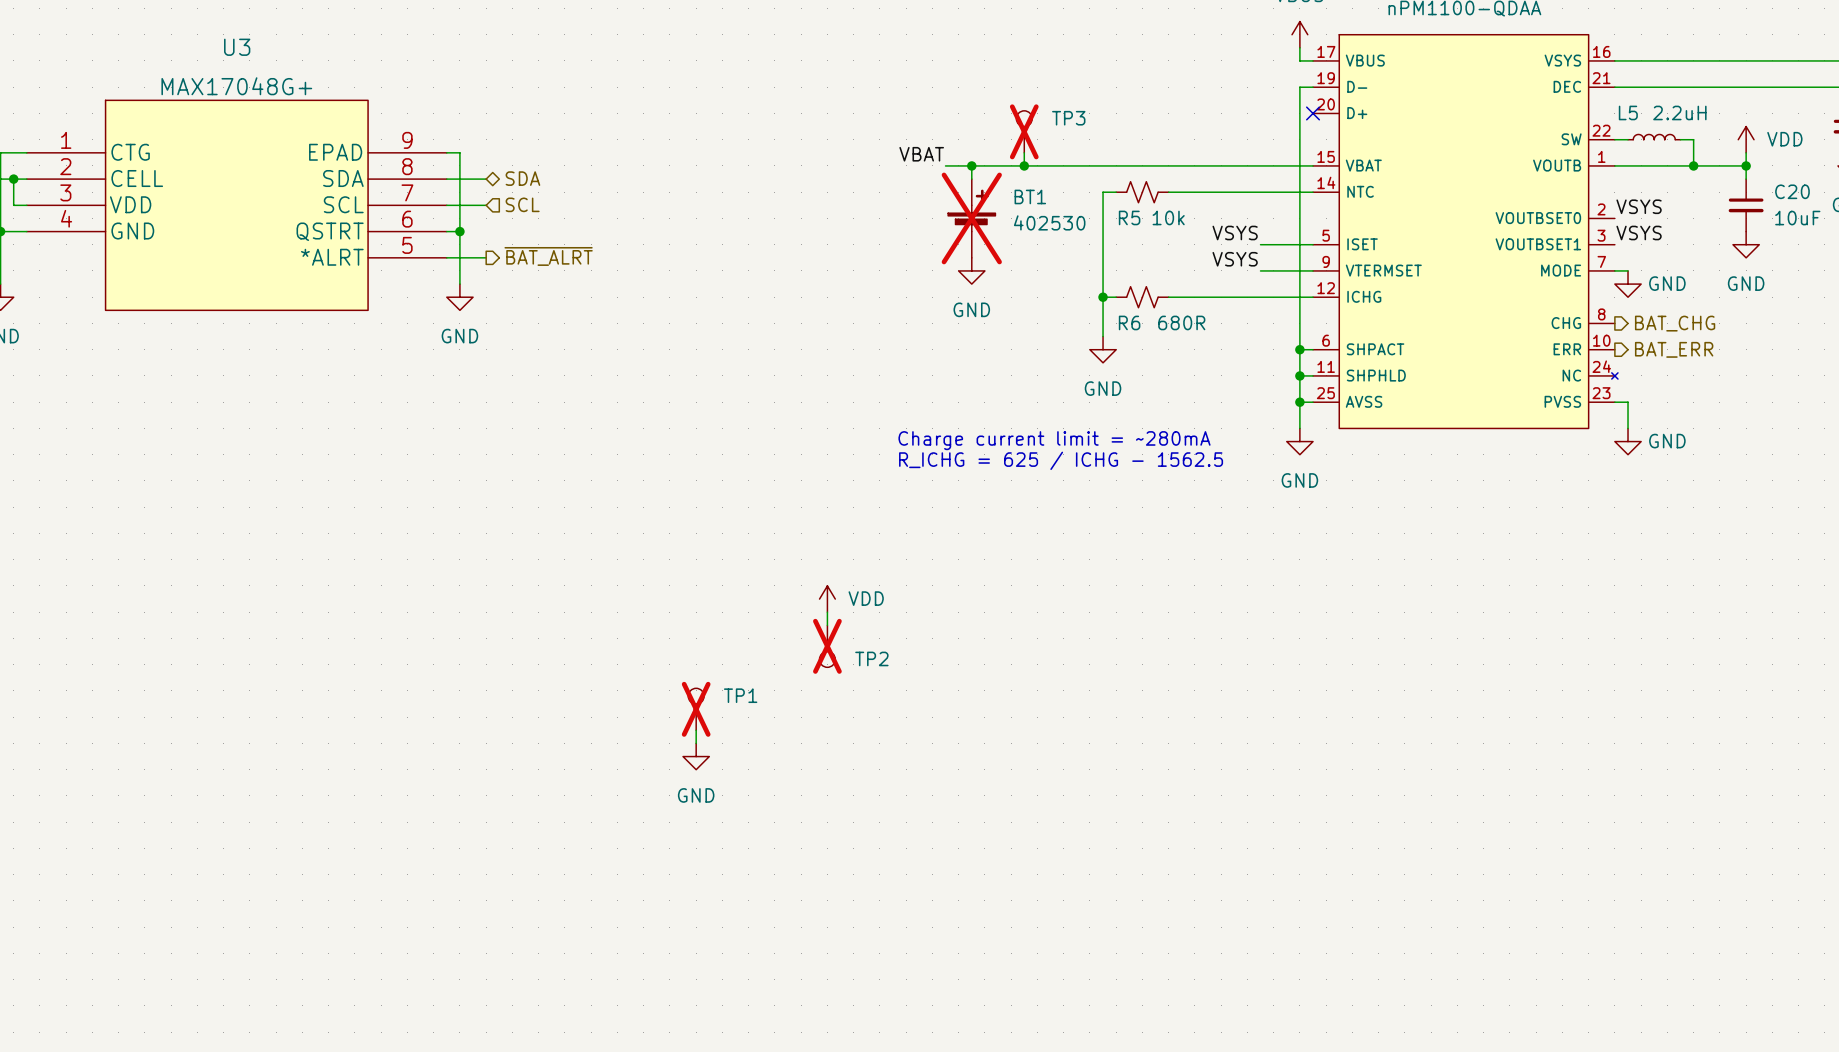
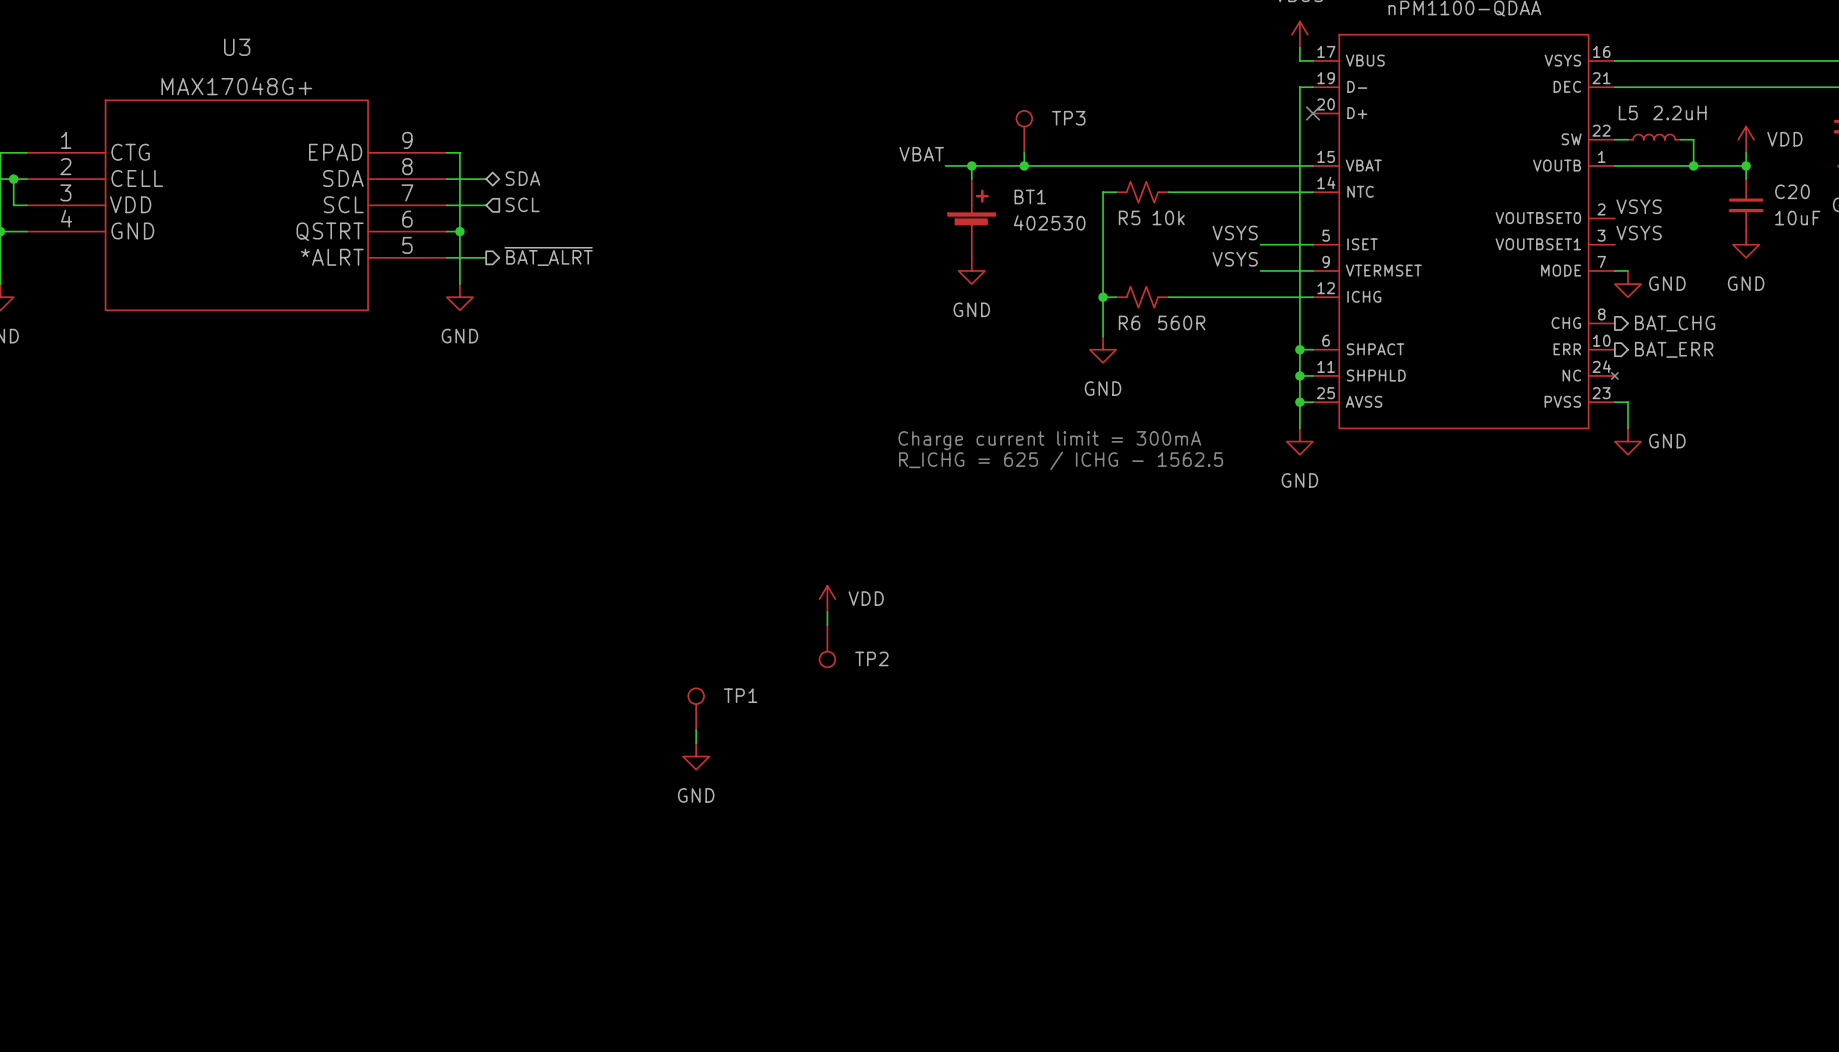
TP3 do-not-place cross: (1024, 131) -> none
BT1 do-not-place cross: (971, 218) -> none
R6 value: 680R (1181, 322) -> 560R (1181, 322)
text: Charge current limit = ~280mA (1054, 440) -> Charge current limit = 300mA (1049, 440)
TP2 do-not-place cross: (827, 646) -> none
TP1 do-not-place cross: (696, 709) -> none

